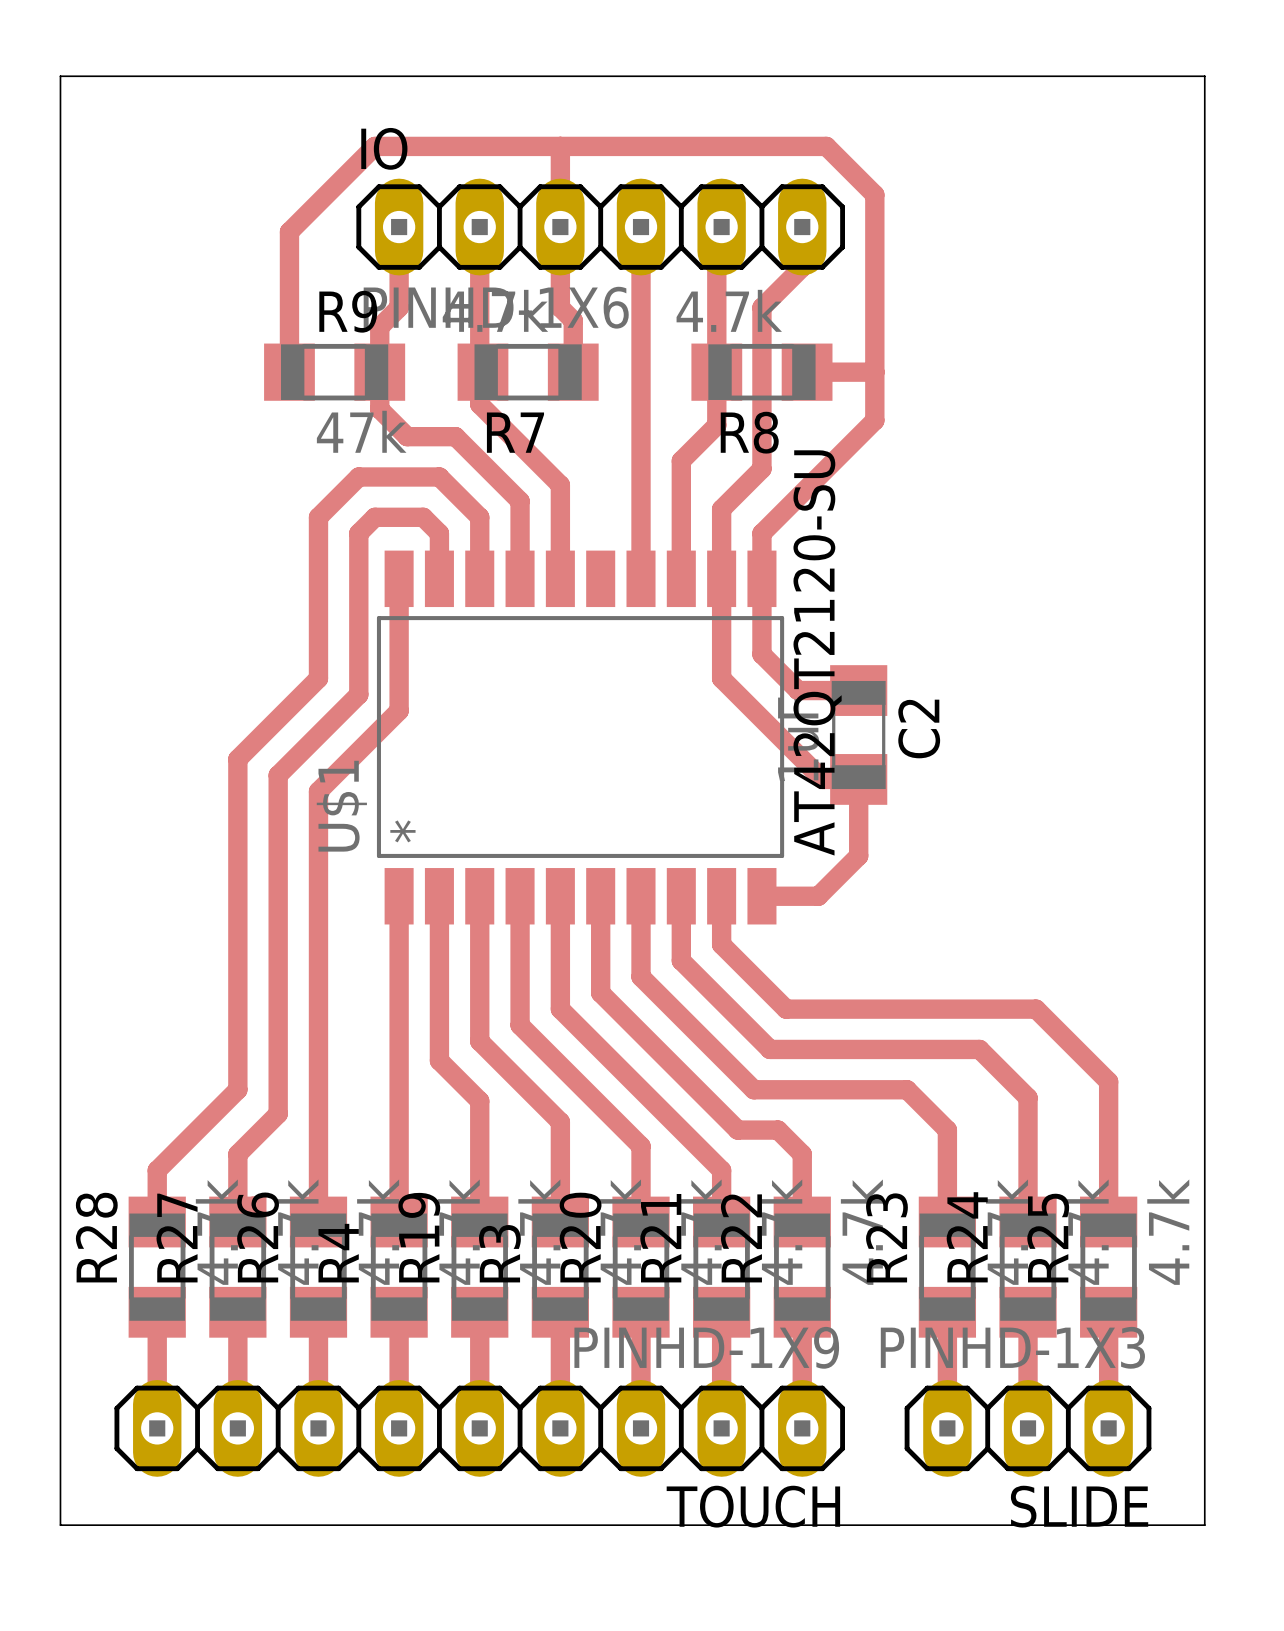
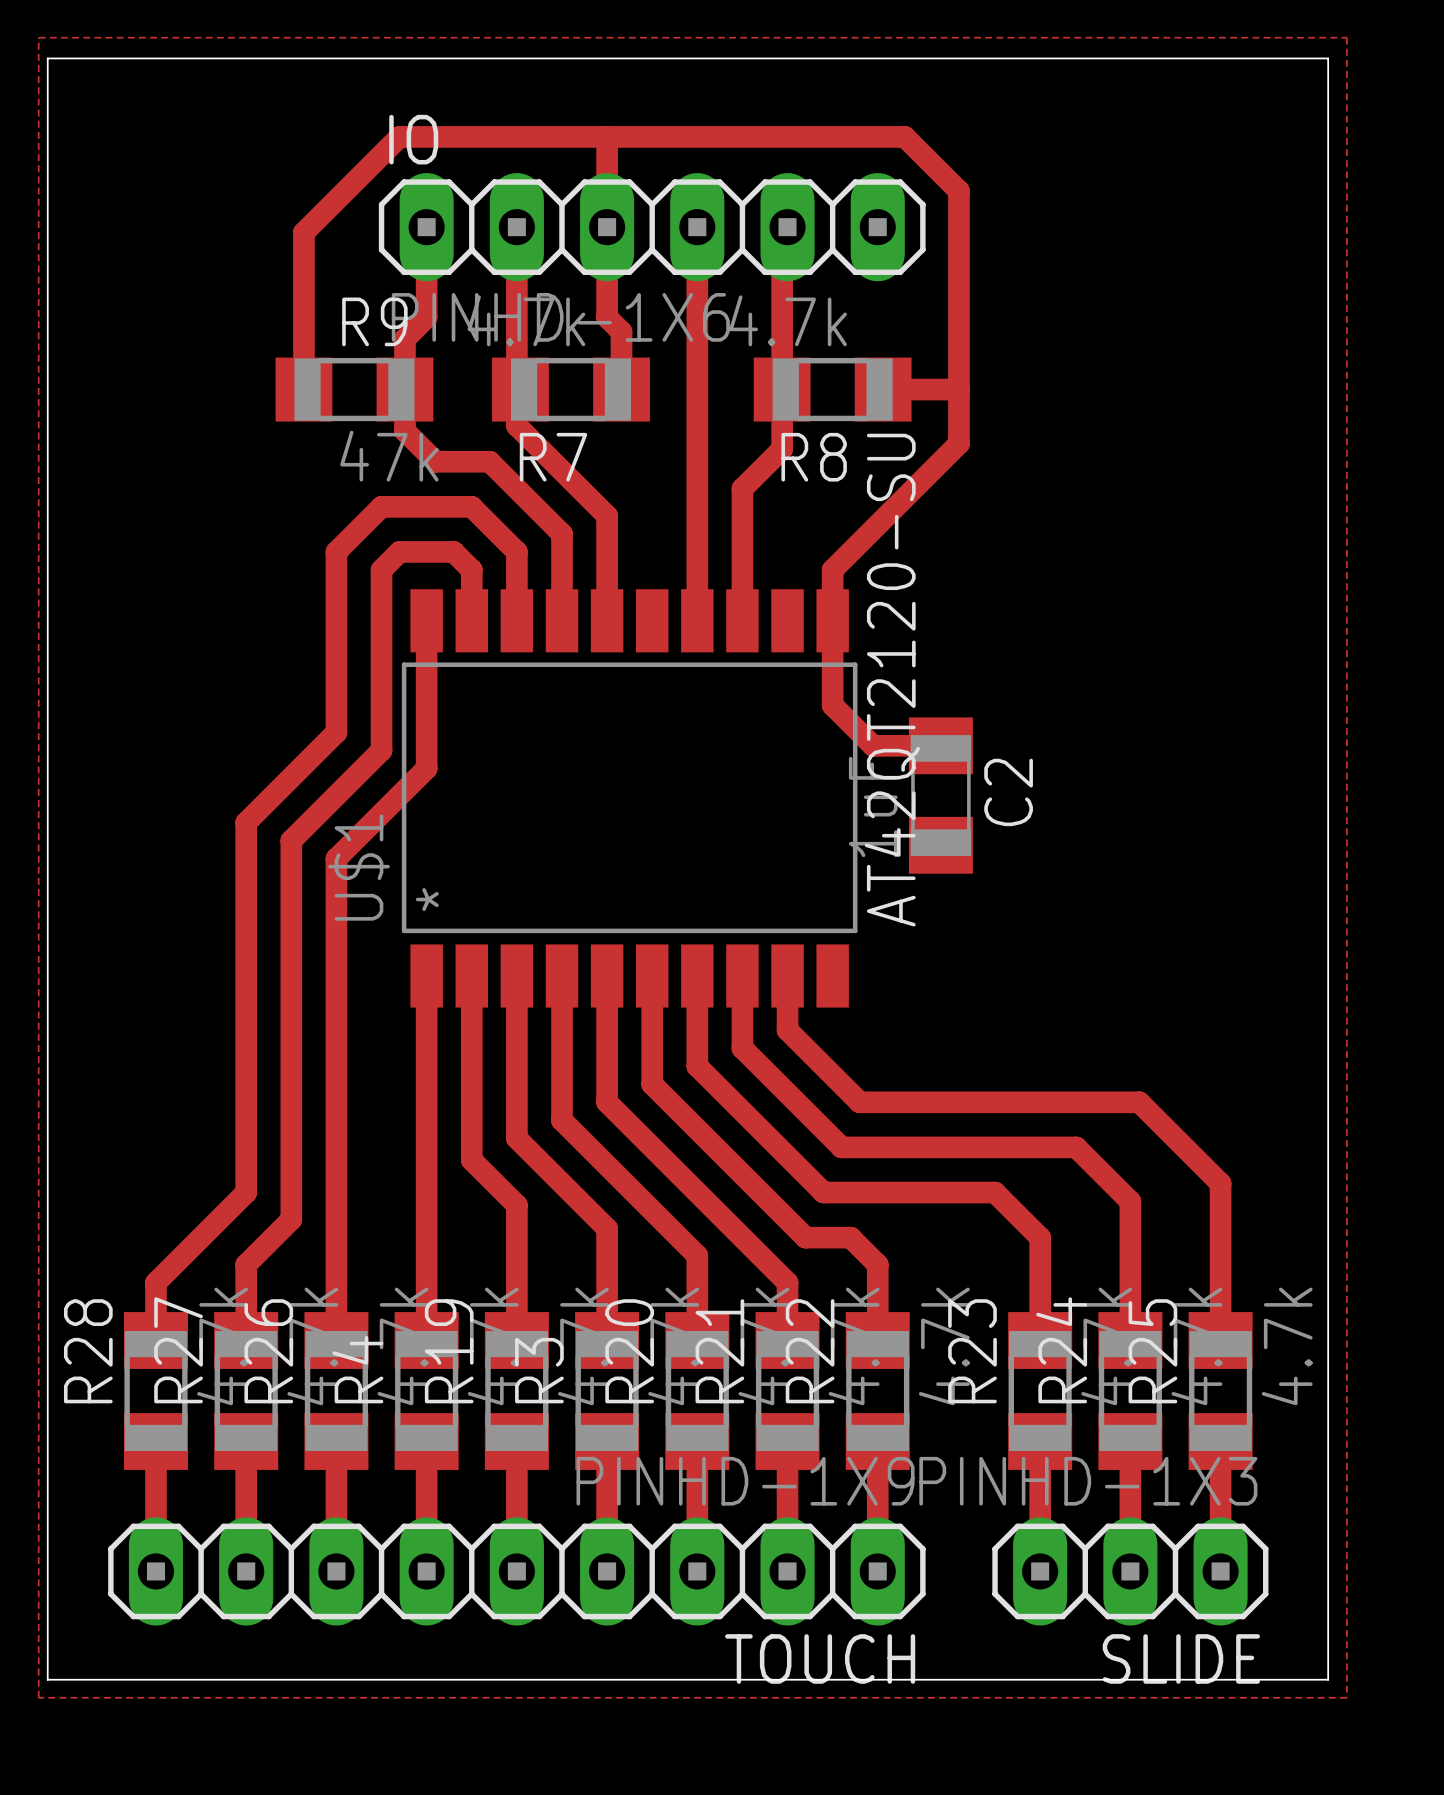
zone outline: none -> (38, 37) (38, 1697) (1346, 1697) (1346, 37) (38, 37)
track: (802, 227) (802, 267) (761, 307) (761, 468) (721, 509) (721, 678) (822, 779) (858, 779) (858, 855) (818, 896) (761, 896) -> none

